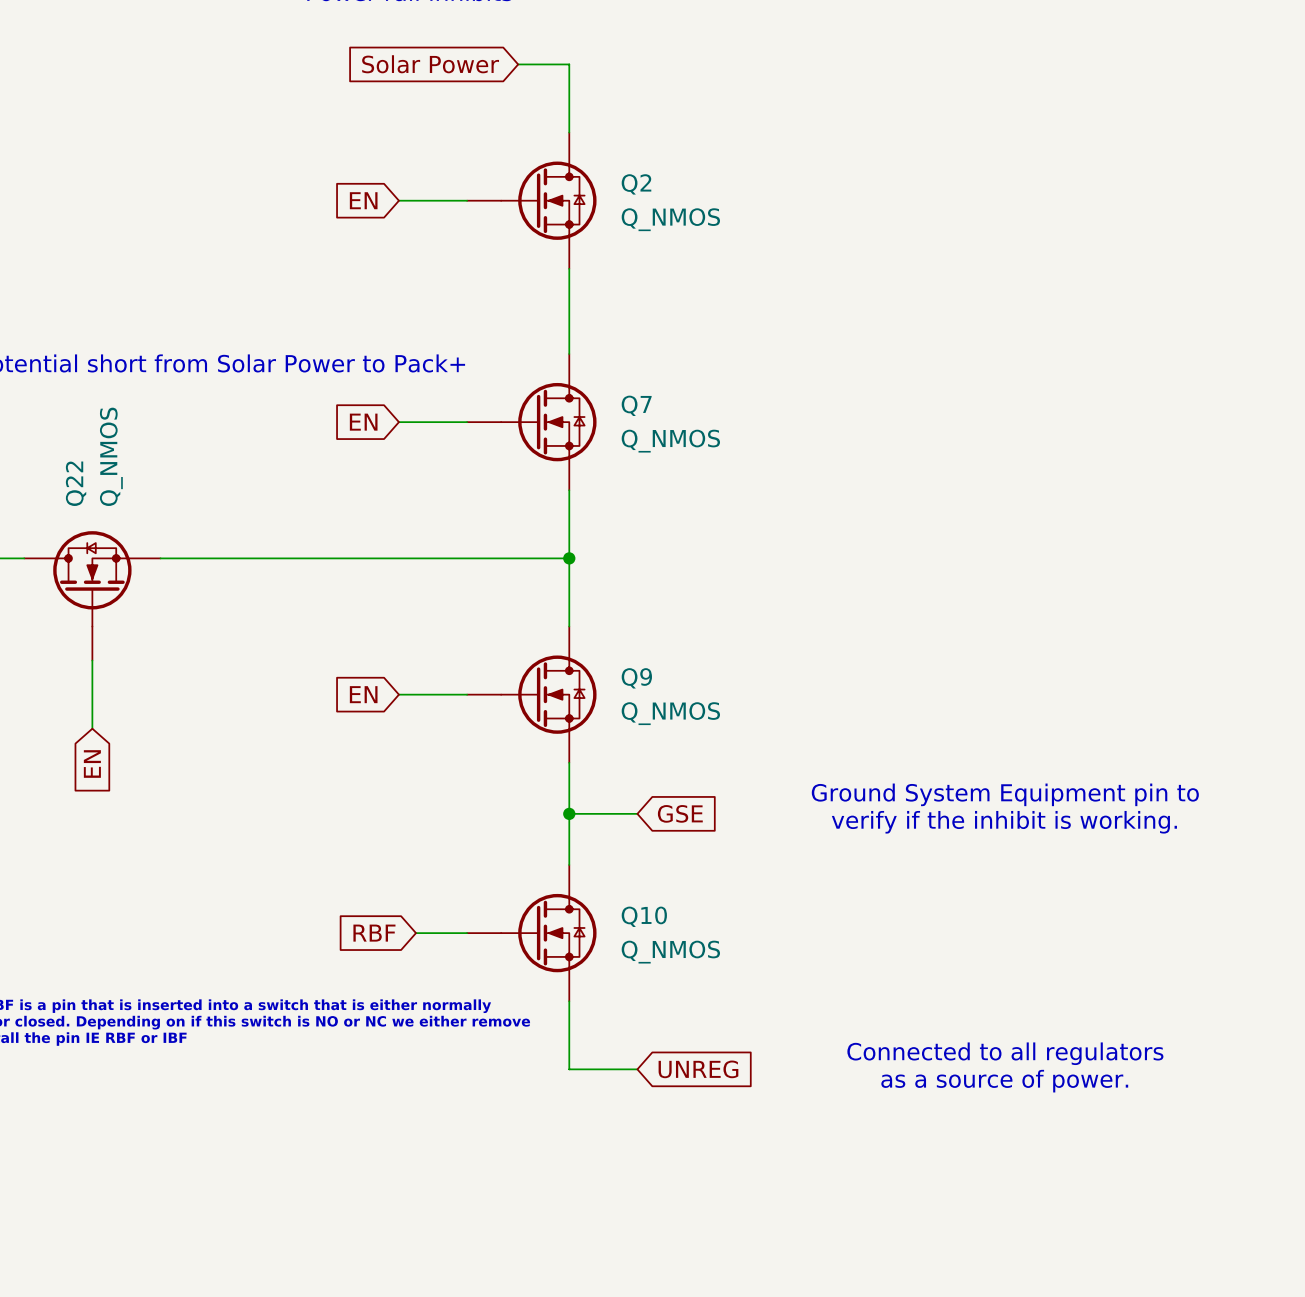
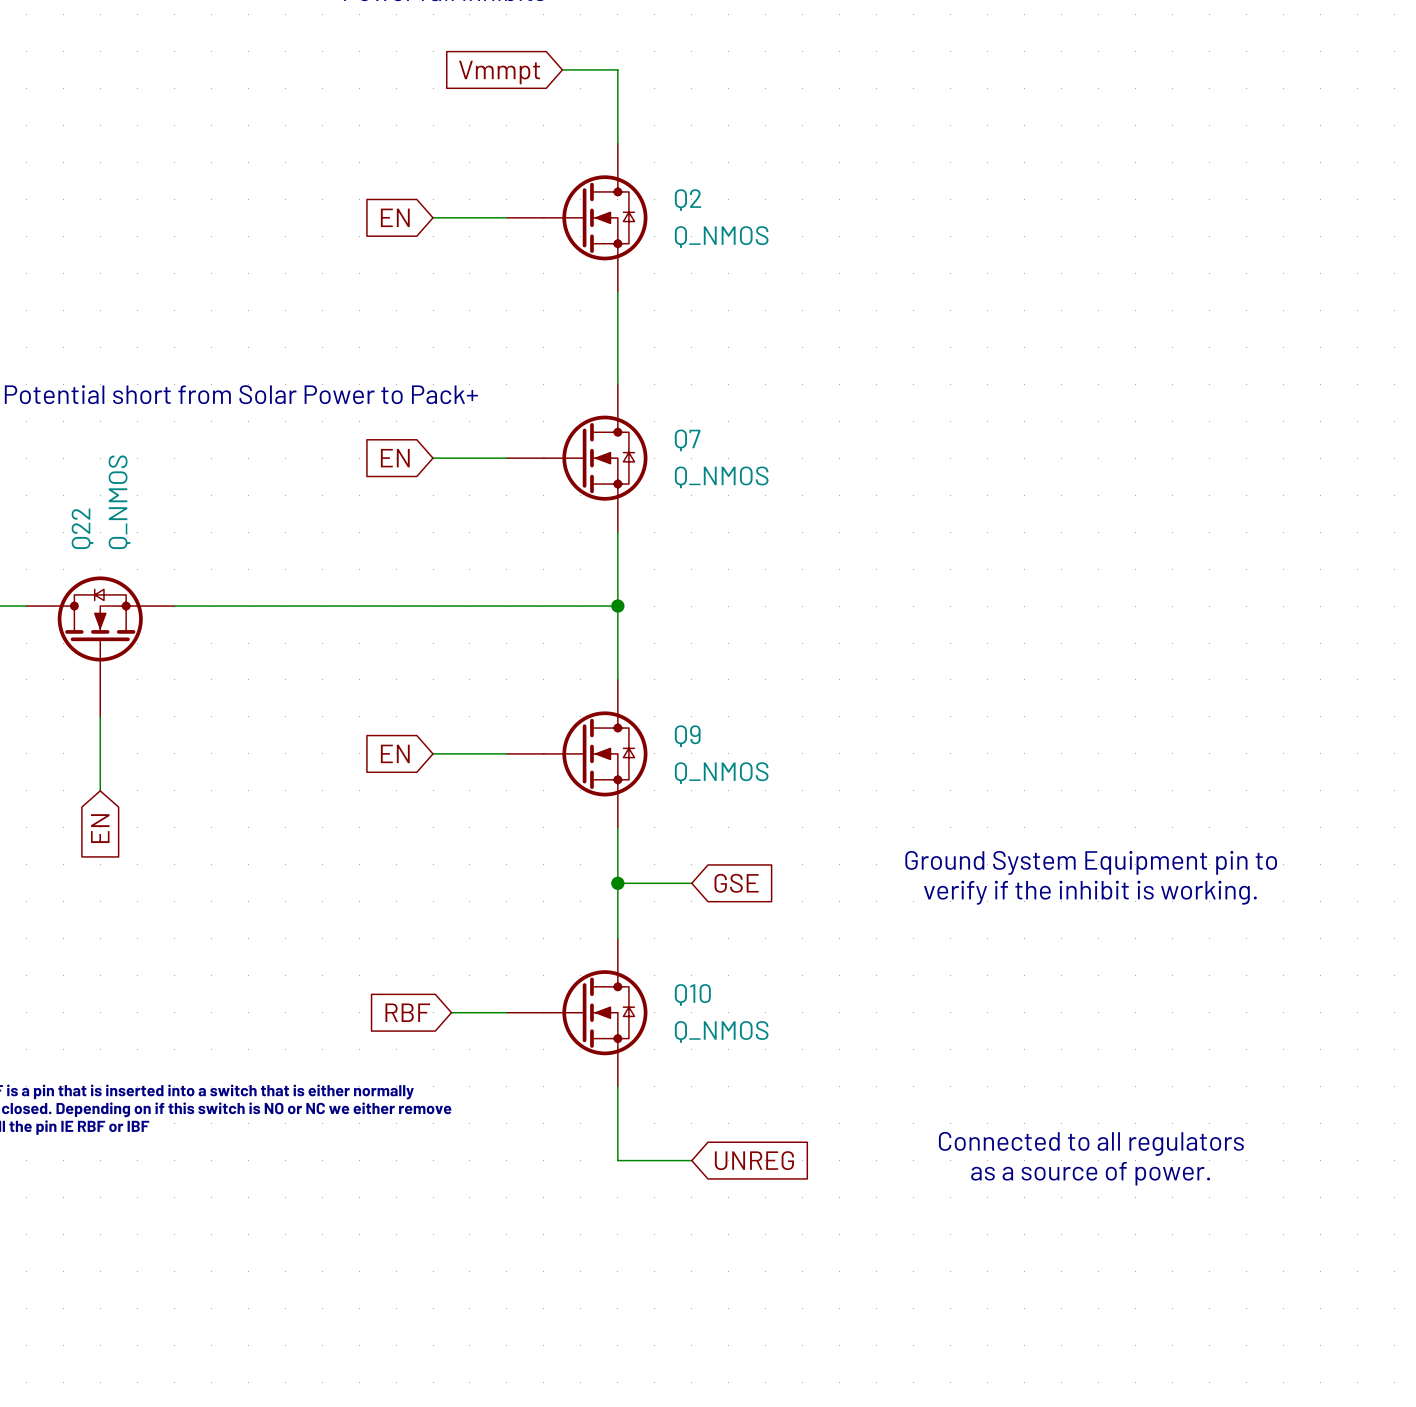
global label: Solar Power (430, 64) -> Vmmpt (499, 72)

